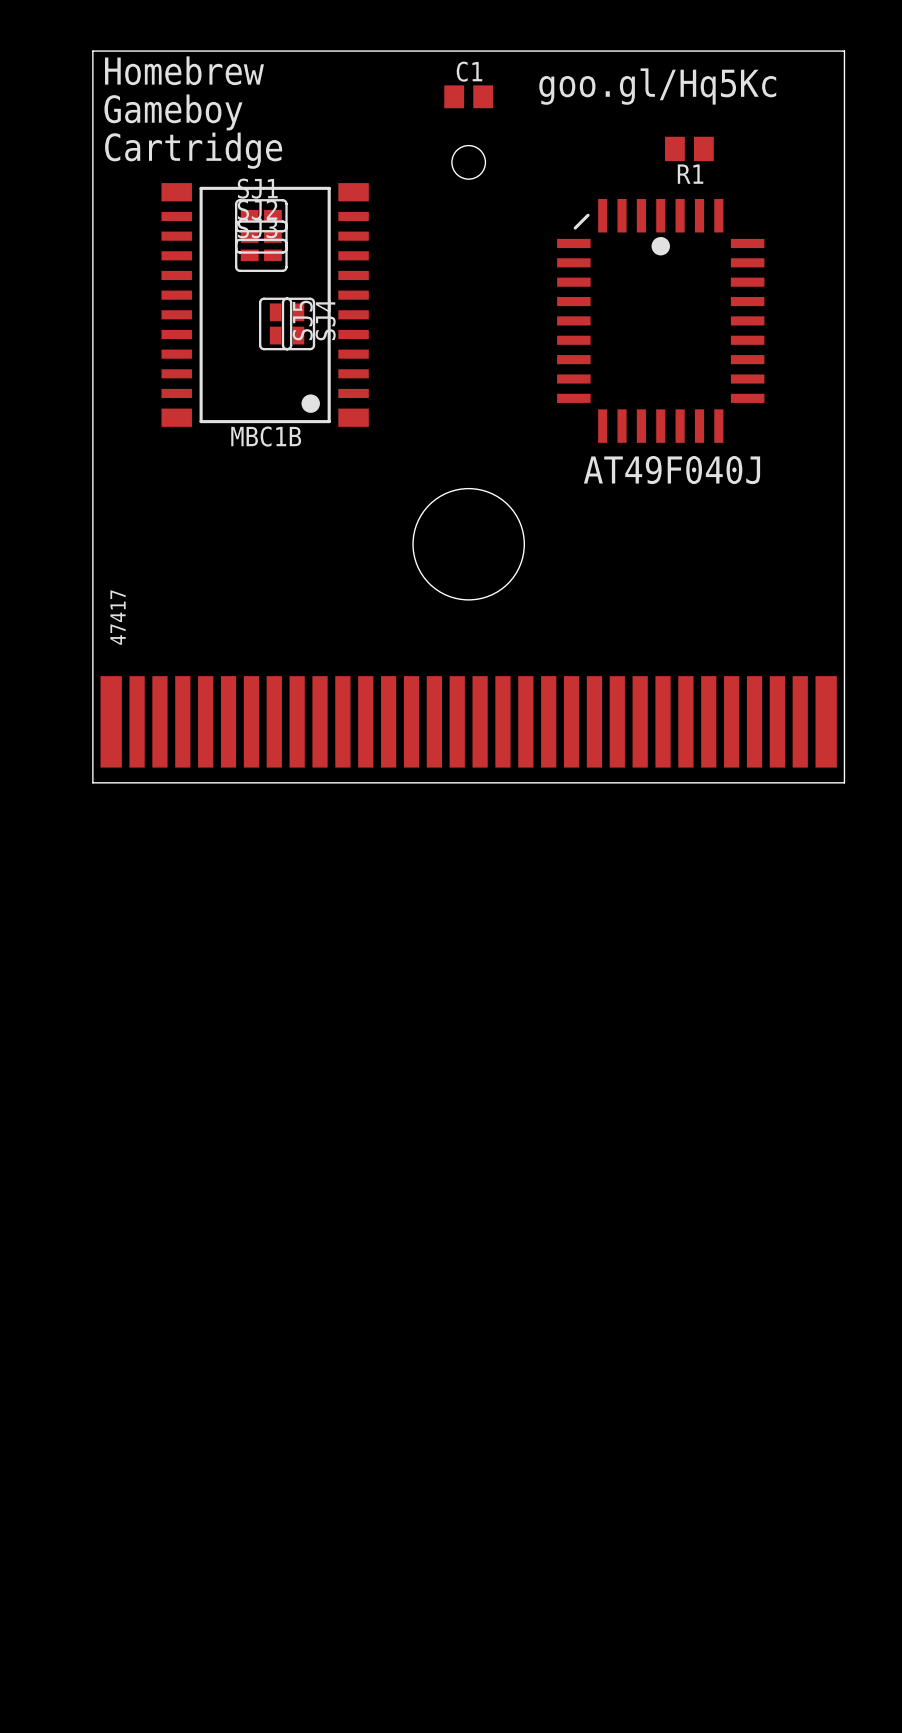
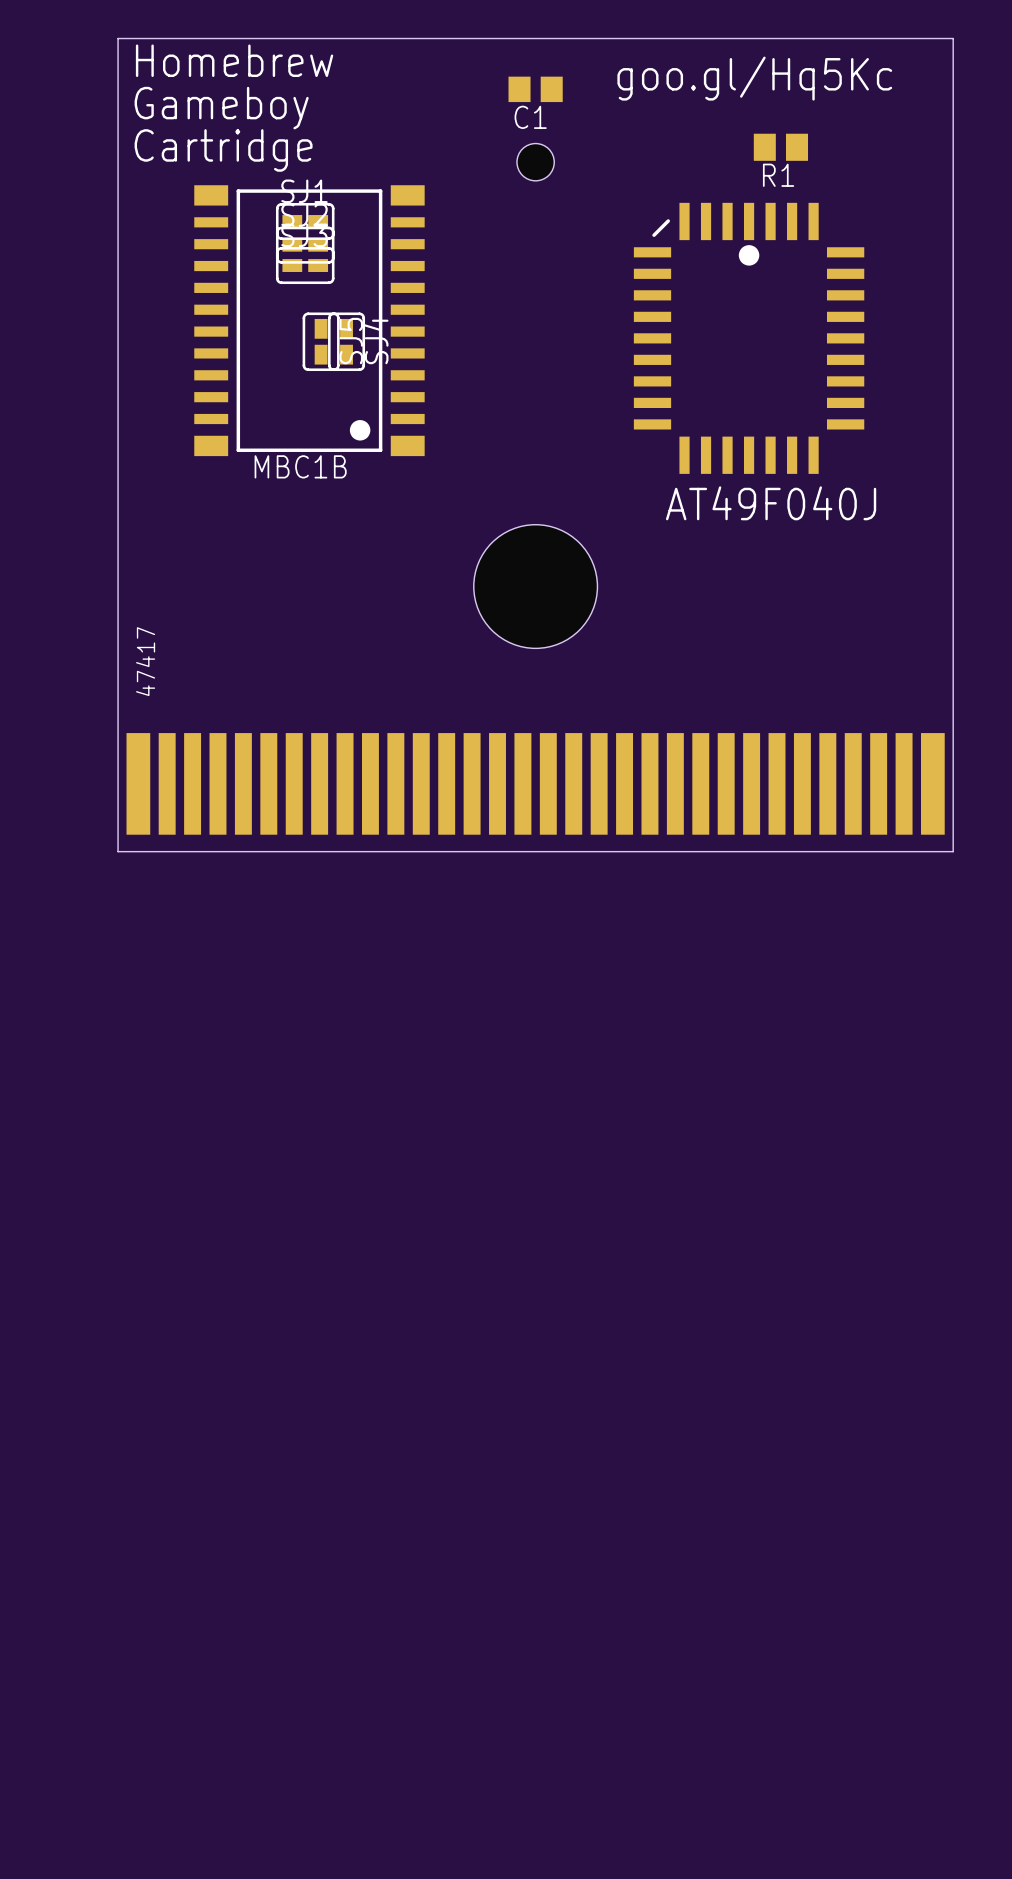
C1 name position: C1 (469, 71) -> C1 (530, 117)

